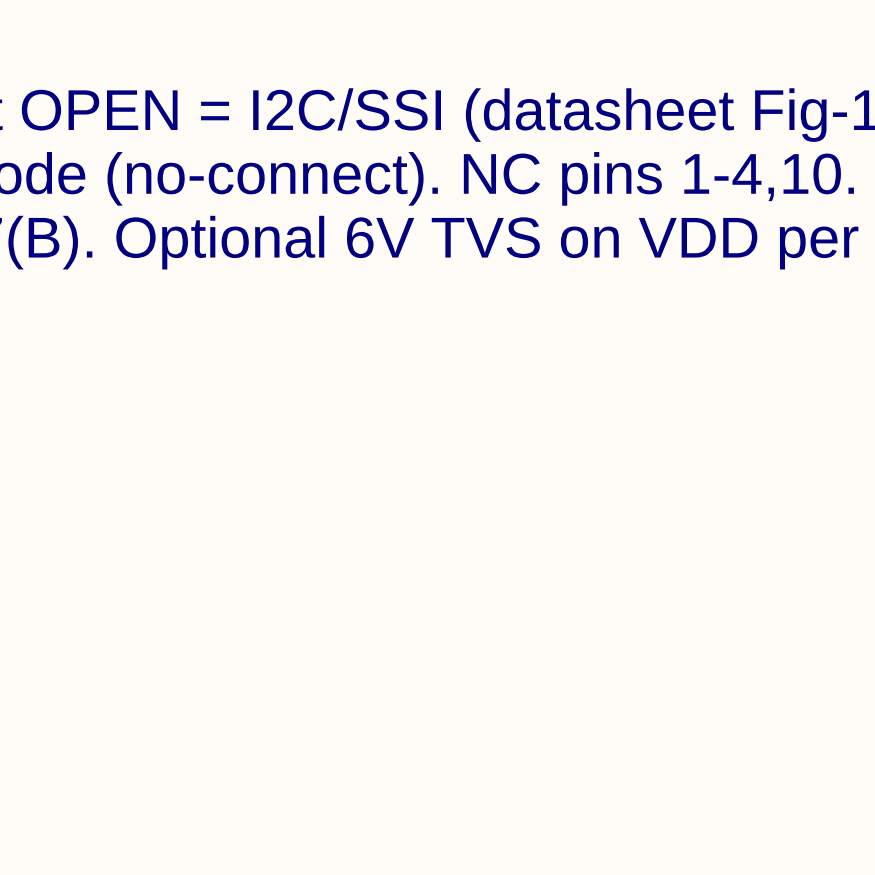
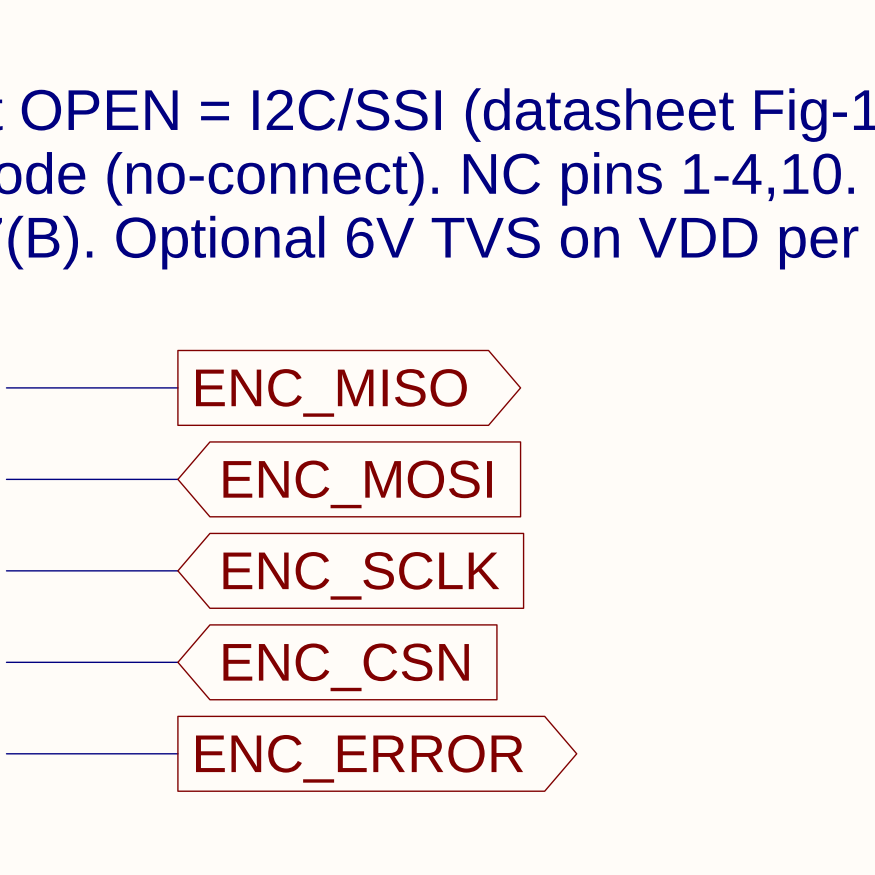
wire: none -> (6, 387) (177, 387)
global label: none -> ENC_MISO (331, 392)
wire: none -> (6, 479) (177, 479)
global label: none -> ENC_MOSI (357, 484)
wire: none -> (6, 570) (177, 570)
global label: none -> ENC_SCLK (361, 575)
wire: none -> (6, 662) (177, 662)
global label: none -> ENC_CSN (346, 667)
wire: none -> (6, 753) (177, 753)
global label: none -> ENC_ERROR (359, 758)

